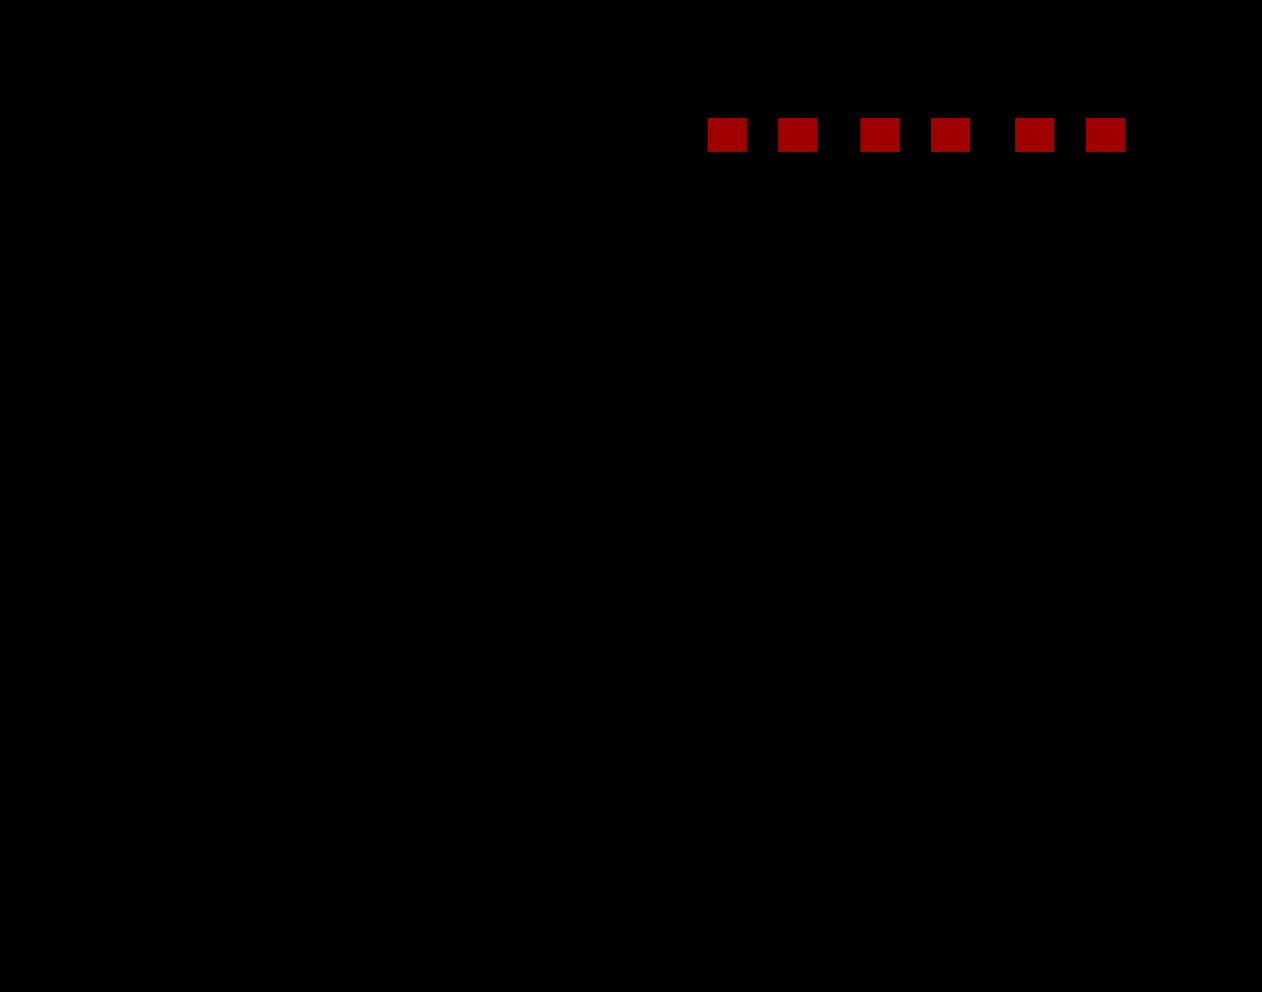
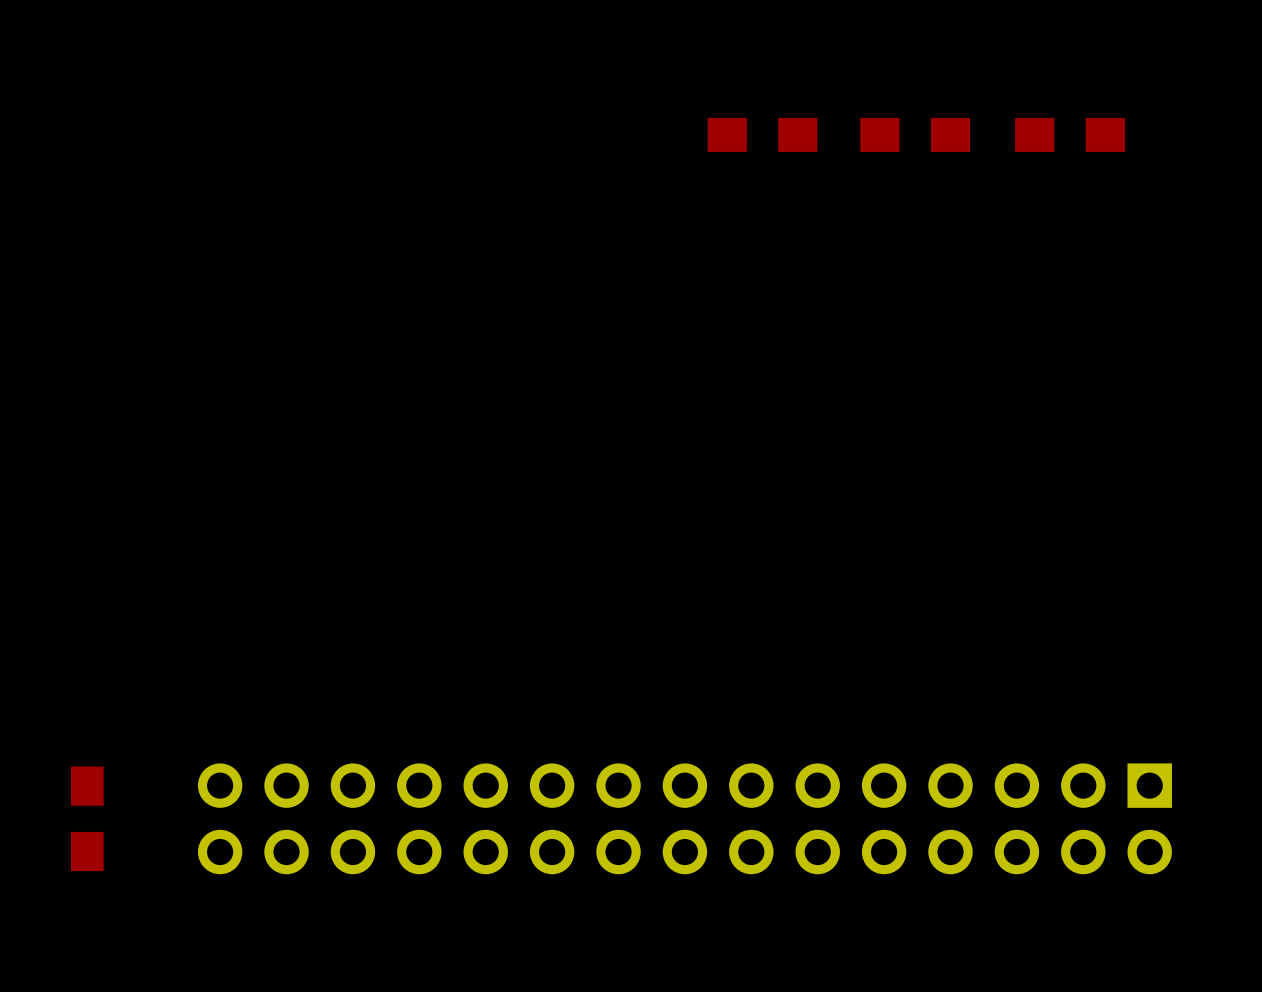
part: none -> (87, 818)
part: none -> (684, 818)

